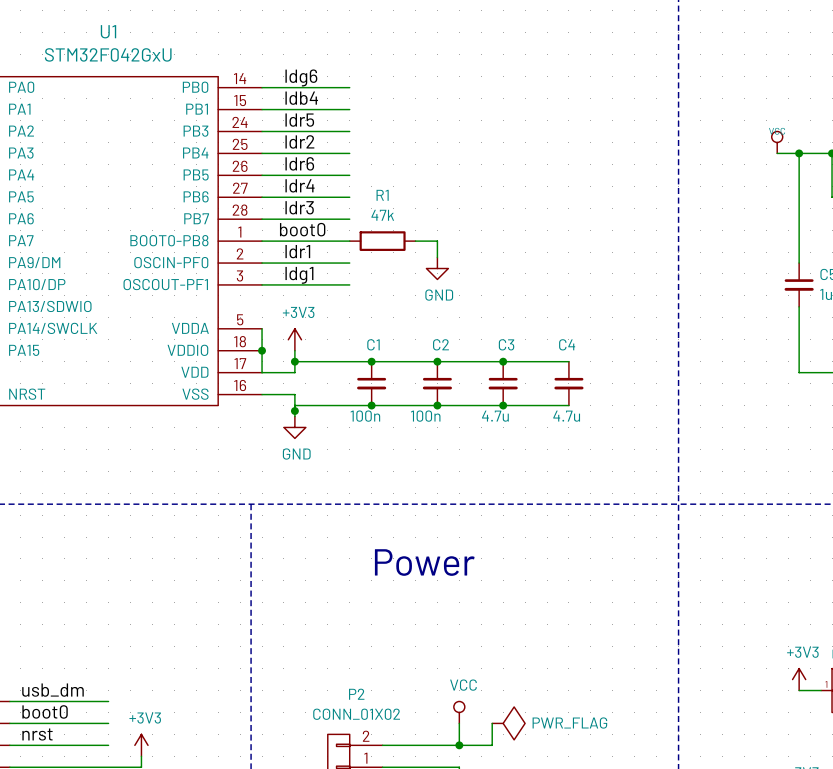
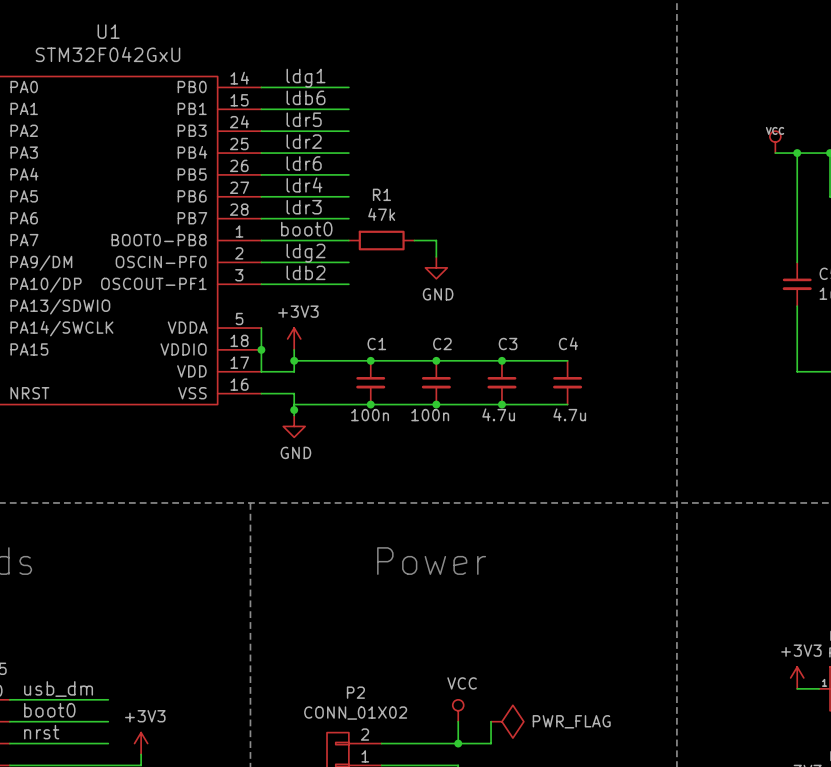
label: ldg6 (301, 77) -> ldg1 (306, 78)
label: ldb4 (301, 98) -> ldb6 (306, 97)
label: ldr1 (297, 251) -> ldg2 (306, 253)
label: ldg1 (299, 275) -> ldb2 (306, 272)

